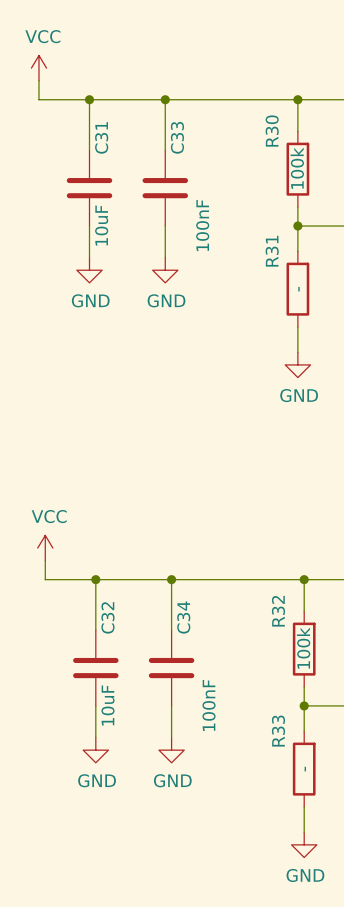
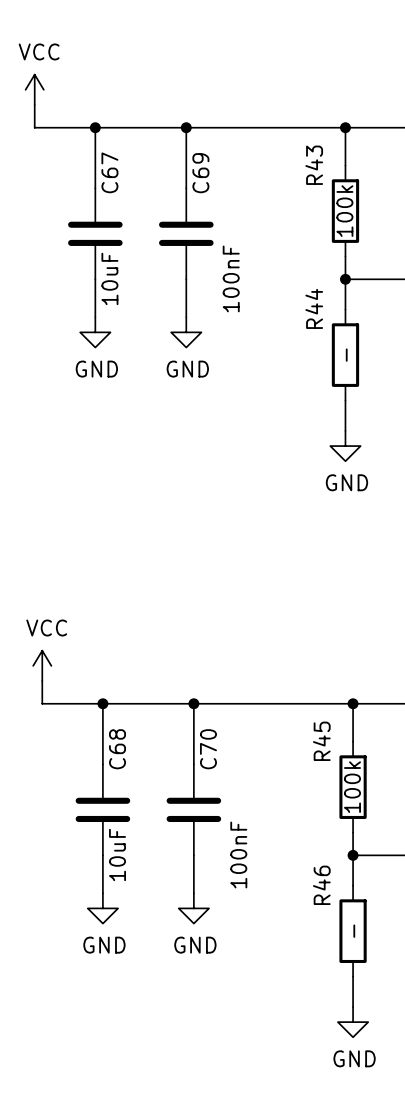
R43 text: R30 (272, 131) -> none
R43 name: none -> R43 (314, 165)
C67 text: C31 (101, 137) -> none
C67 name: none -> C67 (109, 172)
C69 text: C33 (177, 137) -> none
C69 name: none -> C69 (200, 173)
R44 name: none -> R44 (314, 308)
R44 text: R31 (272, 251) -> none
R45 text: R32 (278, 611) -> none
R45 name: none -> R45 (321, 741)
C68 text: C32 (107, 617) -> none
C68 name: none -> C68 (117, 749)
C70 text: C34 (183, 617) -> none
C70 name: none -> C70 (208, 749)
R46 name: none -> R46 (321, 885)
R46 text: R33 (278, 731) -> none

